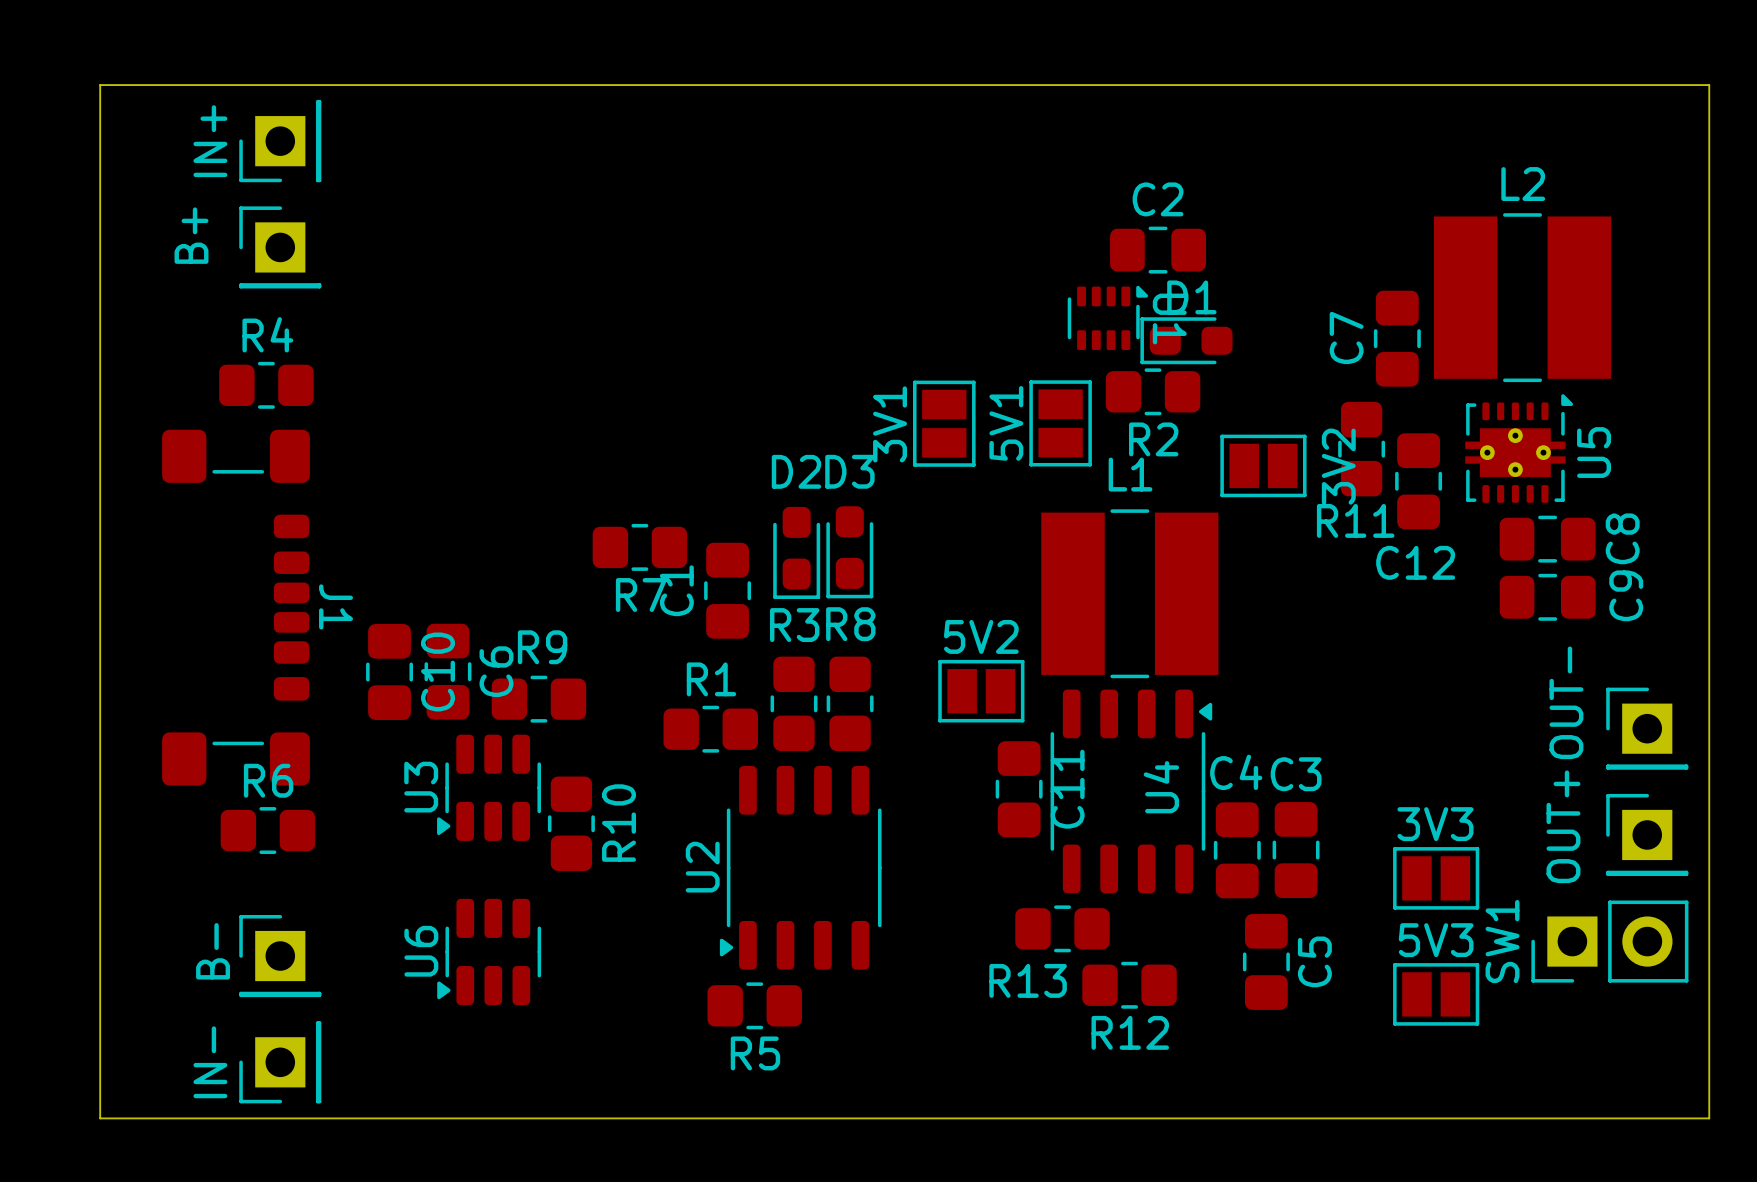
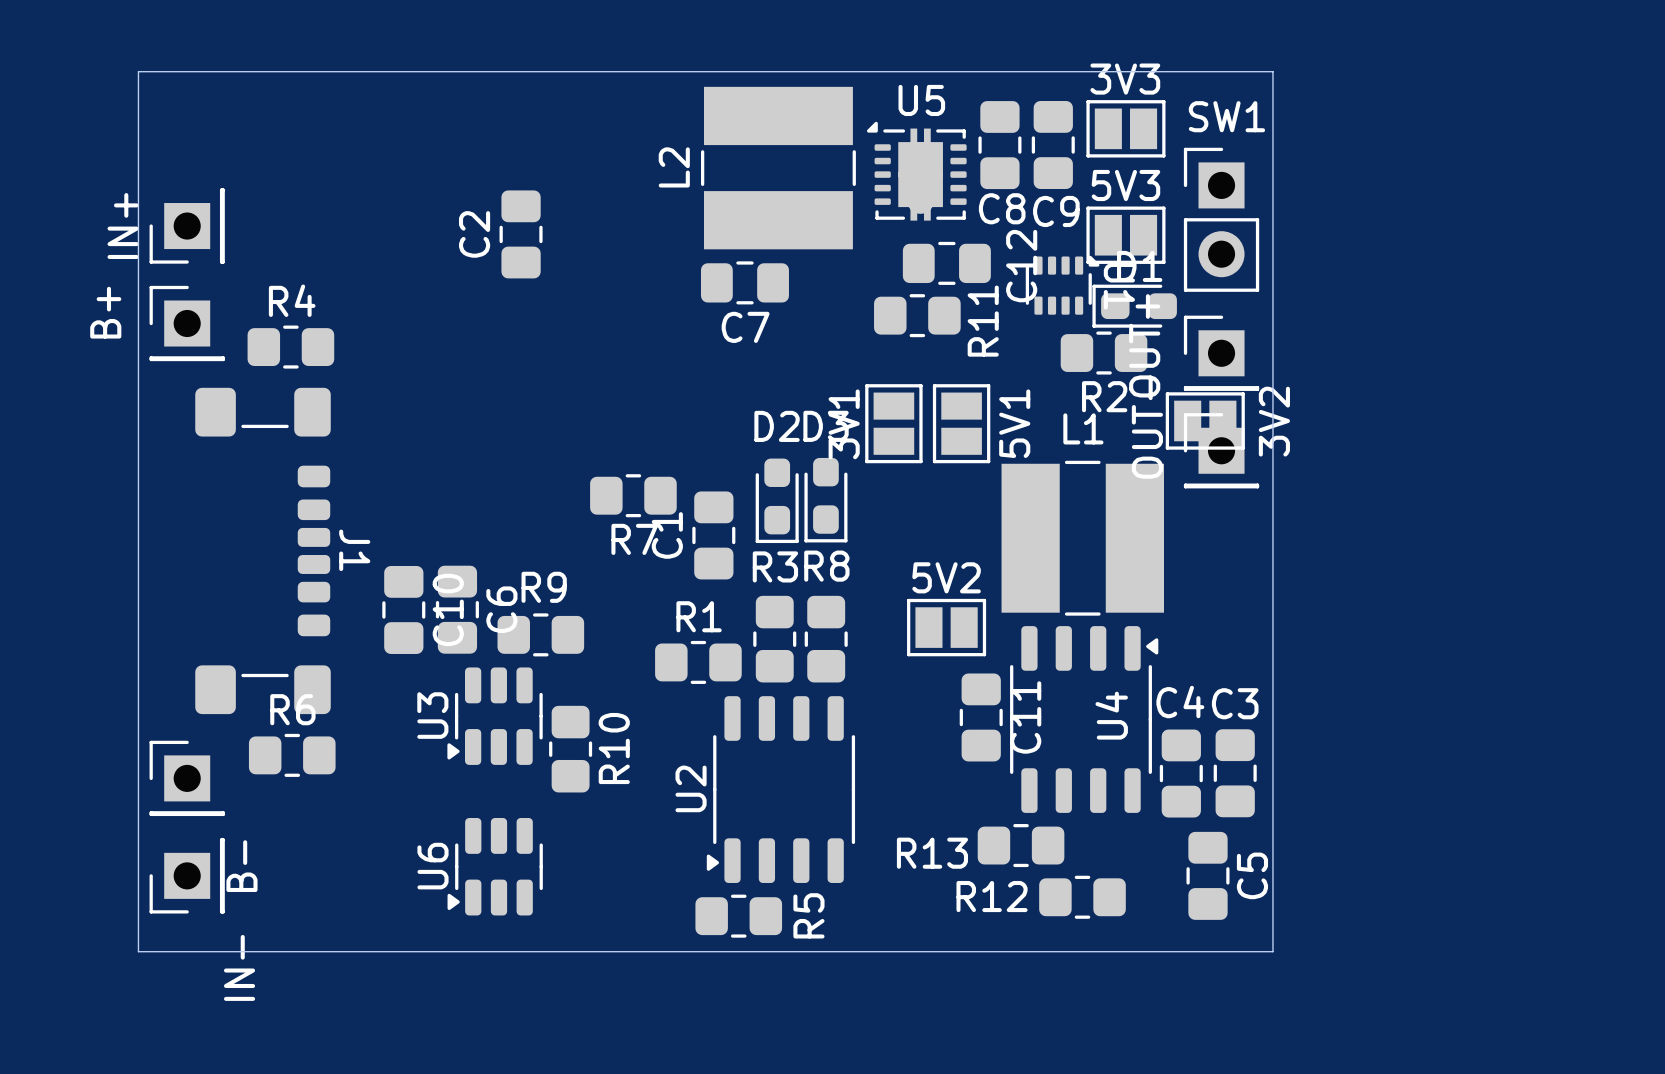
board edge: (1337, 85) (1709, 85) (1709, 1118) (100, 1118) (100, 1044) -> (1272, 71) (1272, 951) (138, 951)
IN+ position: (280, 141) -> (187, 226)
L2 name position: L2 (1523, 184) -> L2 (674, 167)
C2 name position: C2 (1158, 199) -> C2 (474, 234)
B+ position: (280, 247) -> (187, 323)
C2 rotation: 0° (1158, 250) -> 90° clockwise (521, 234)
C2 position: (1158, 250) -> (521, 234)
L2 rotation: 0° (1522, 297) -> 90° clockwise (778, 168)
L2 position: (1522, 297) -> (778, 168)
C7 name position: C7 (1346, 337) -> C7 (745, 327)
C7 rotation: 0° (1397, 338) -> 90° clockwise (744, 282)
C7 position: (1397, 338) -> (744, 282)
U5 footprint: [1465, 394, 1574, 503] -> [866, 121, 967, 221]
3V1 position: (944, 423) -> (893, 423)
5V1 name position: 5V1 (1006, 423) -> 5V1 (1014, 423)
5V1 position: (1060, 423) -> (961, 423)
R11 rotation: 0° (1361, 449) -> 90° clockwise (917, 315)
R11 position: (1361, 449) -> (917, 315)
U5 name position: U5 (1594, 452) -> U5 (921, 100)
C12 rotation: 0° (1418, 481) -> 90° clockwise (946, 263)
C12 position: (1418, 481) -> (946, 263)
R11 name position: R11 (1355, 520) -> R11 (983, 321)
C8 rotation: 0° (1547, 539) -> 90° clockwise (999, 145)
C8 position: (1547, 539) -> (999, 145)
C12 name position: C12 (1415, 562) -> C12 (1021, 266)
C9 rotation: 0° (1547, 597) -> 90° clockwise (1053, 145)
C9 position: (1547, 597) -> (1053, 145)
OUT- position: (1647, 728) -> (1221, 450)
OUT+ position: (1647, 834) -> (1221, 353)
3V3 position: (1436, 878) -> (1125, 128)
SW1 rotation: 0° (1609, 941) -> 90° clockwise (1221, 219)
SW1 position: (1609, 941) -> (1221, 219)
B- position: (280, 956) -> (187, 778)
R13 name position: R13 (1028, 980) -> R13 (932, 853)
5V3 position: (1436, 994) -> (1125, 235)
R12 name position: R12 (1130, 1032) -> R12 (992, 896)
R5 name rotation: 0° (755, 1053) -> 90° counterclockwise (808, 915)
R5 name position: R5 (755, 1053) -> R5 (808, 915)
IN- position: (280, 1062) -> (187, 875)

